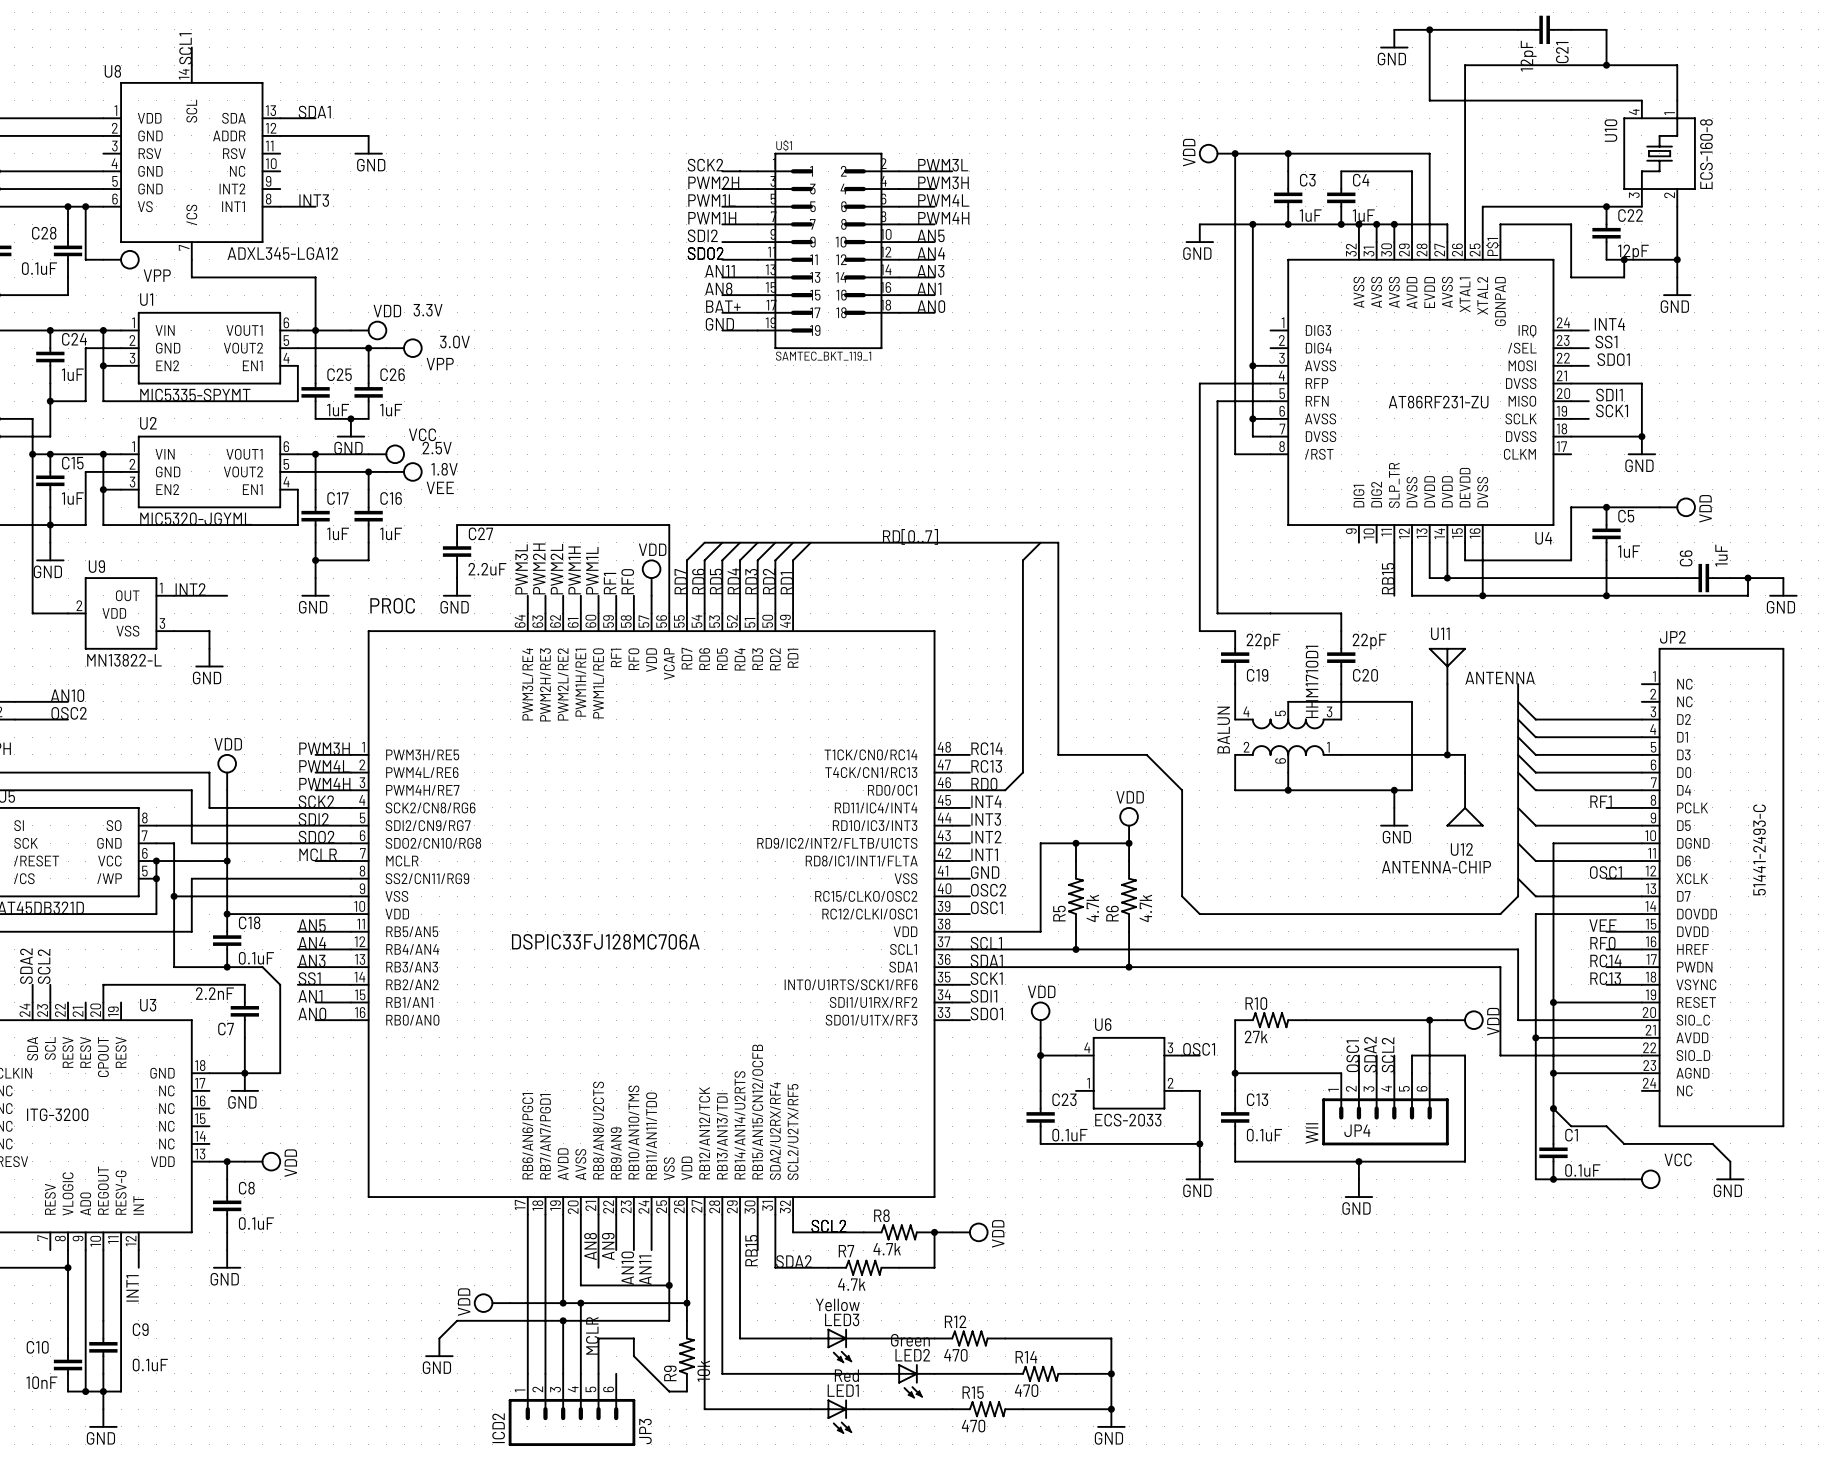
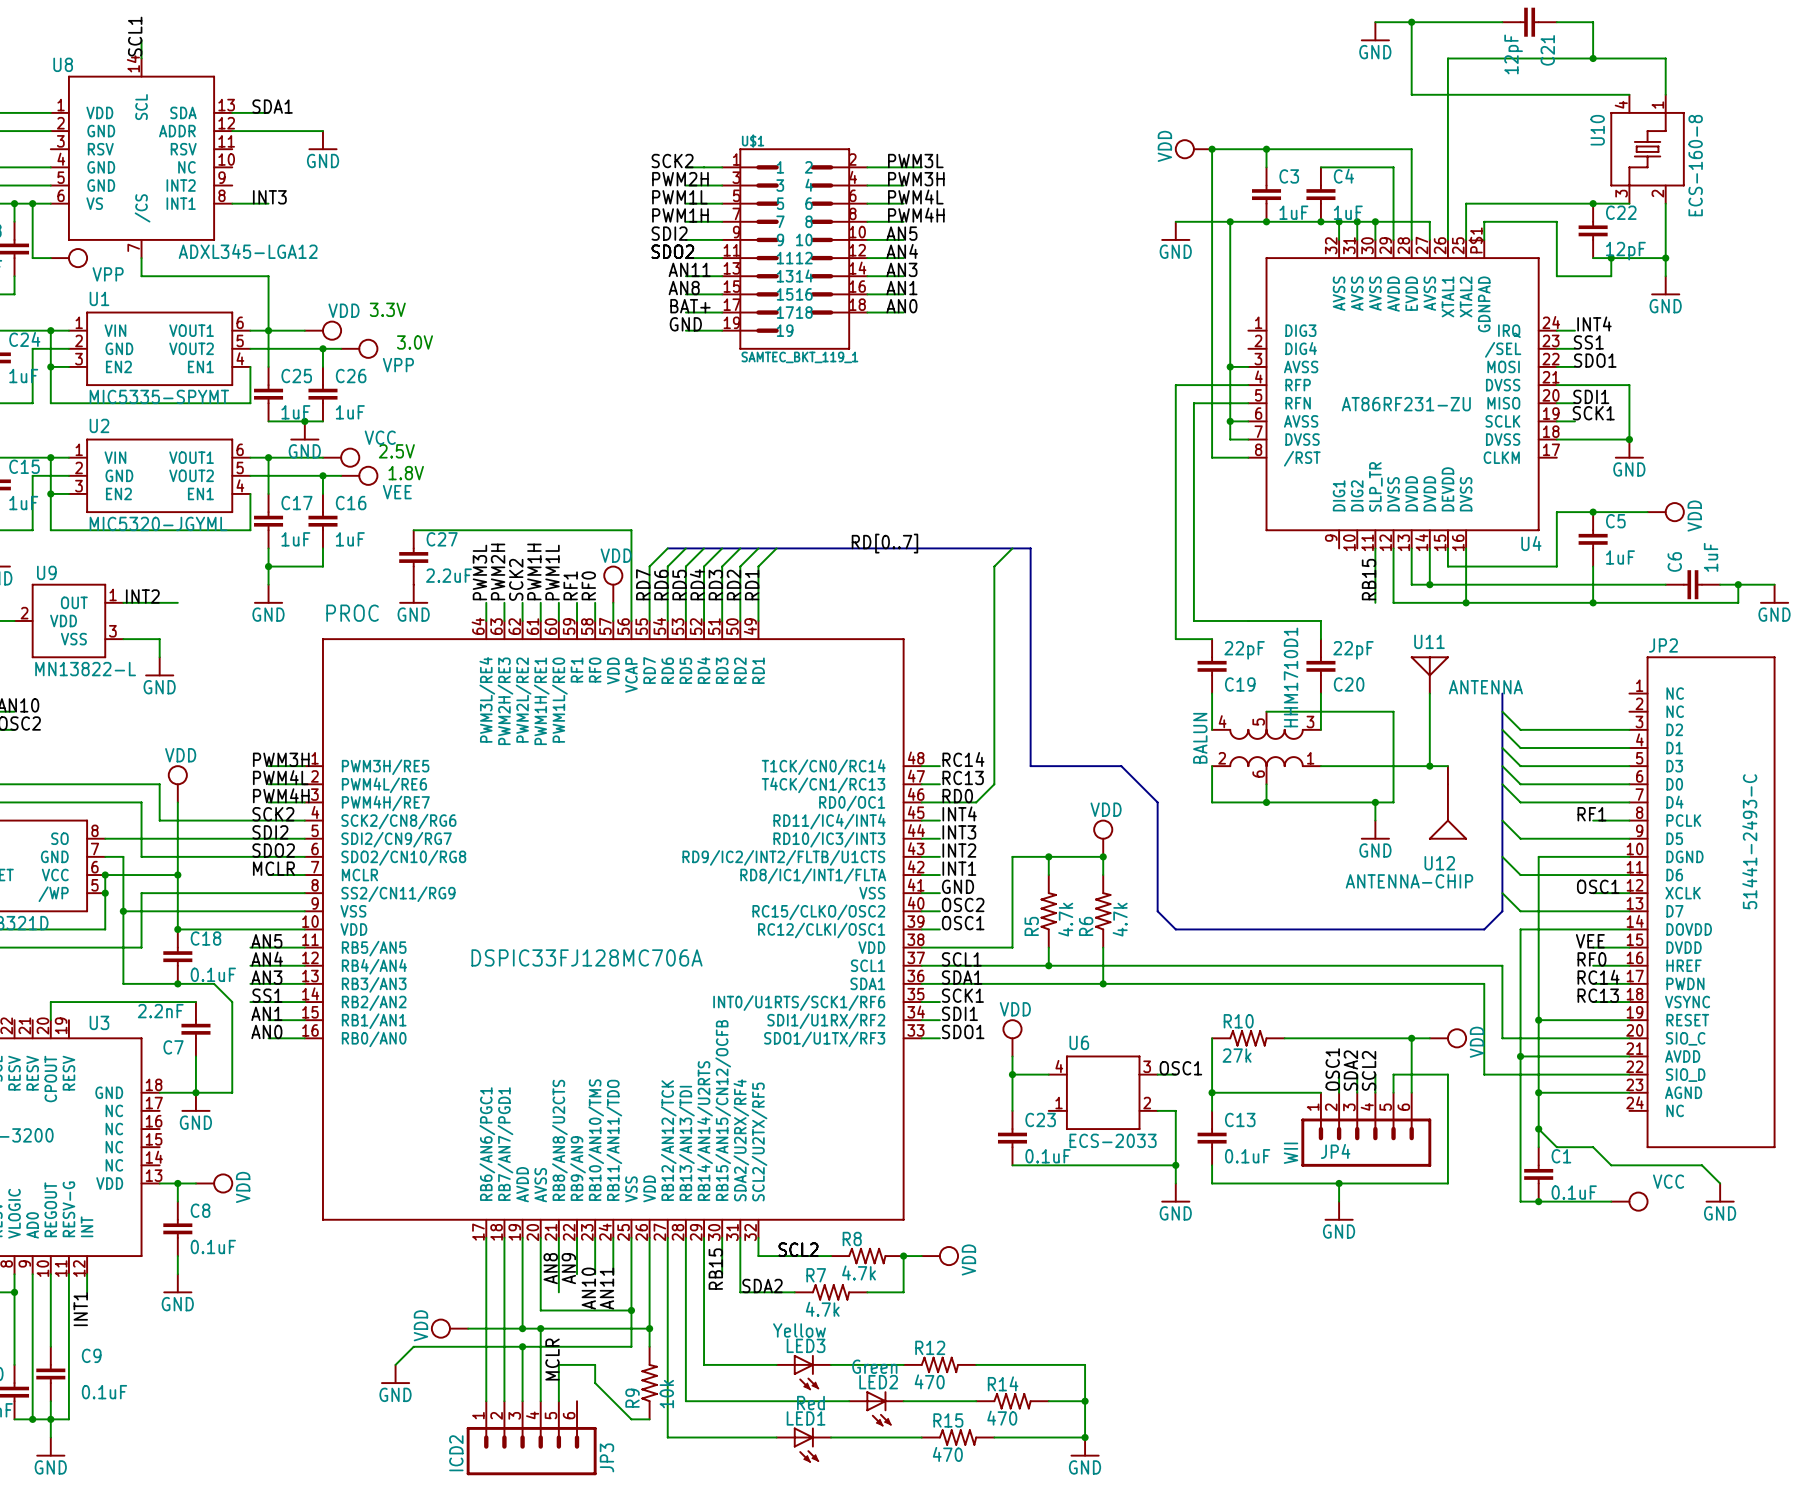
label: PWM2L (556, 569) -> SCK2 (516, 579)

